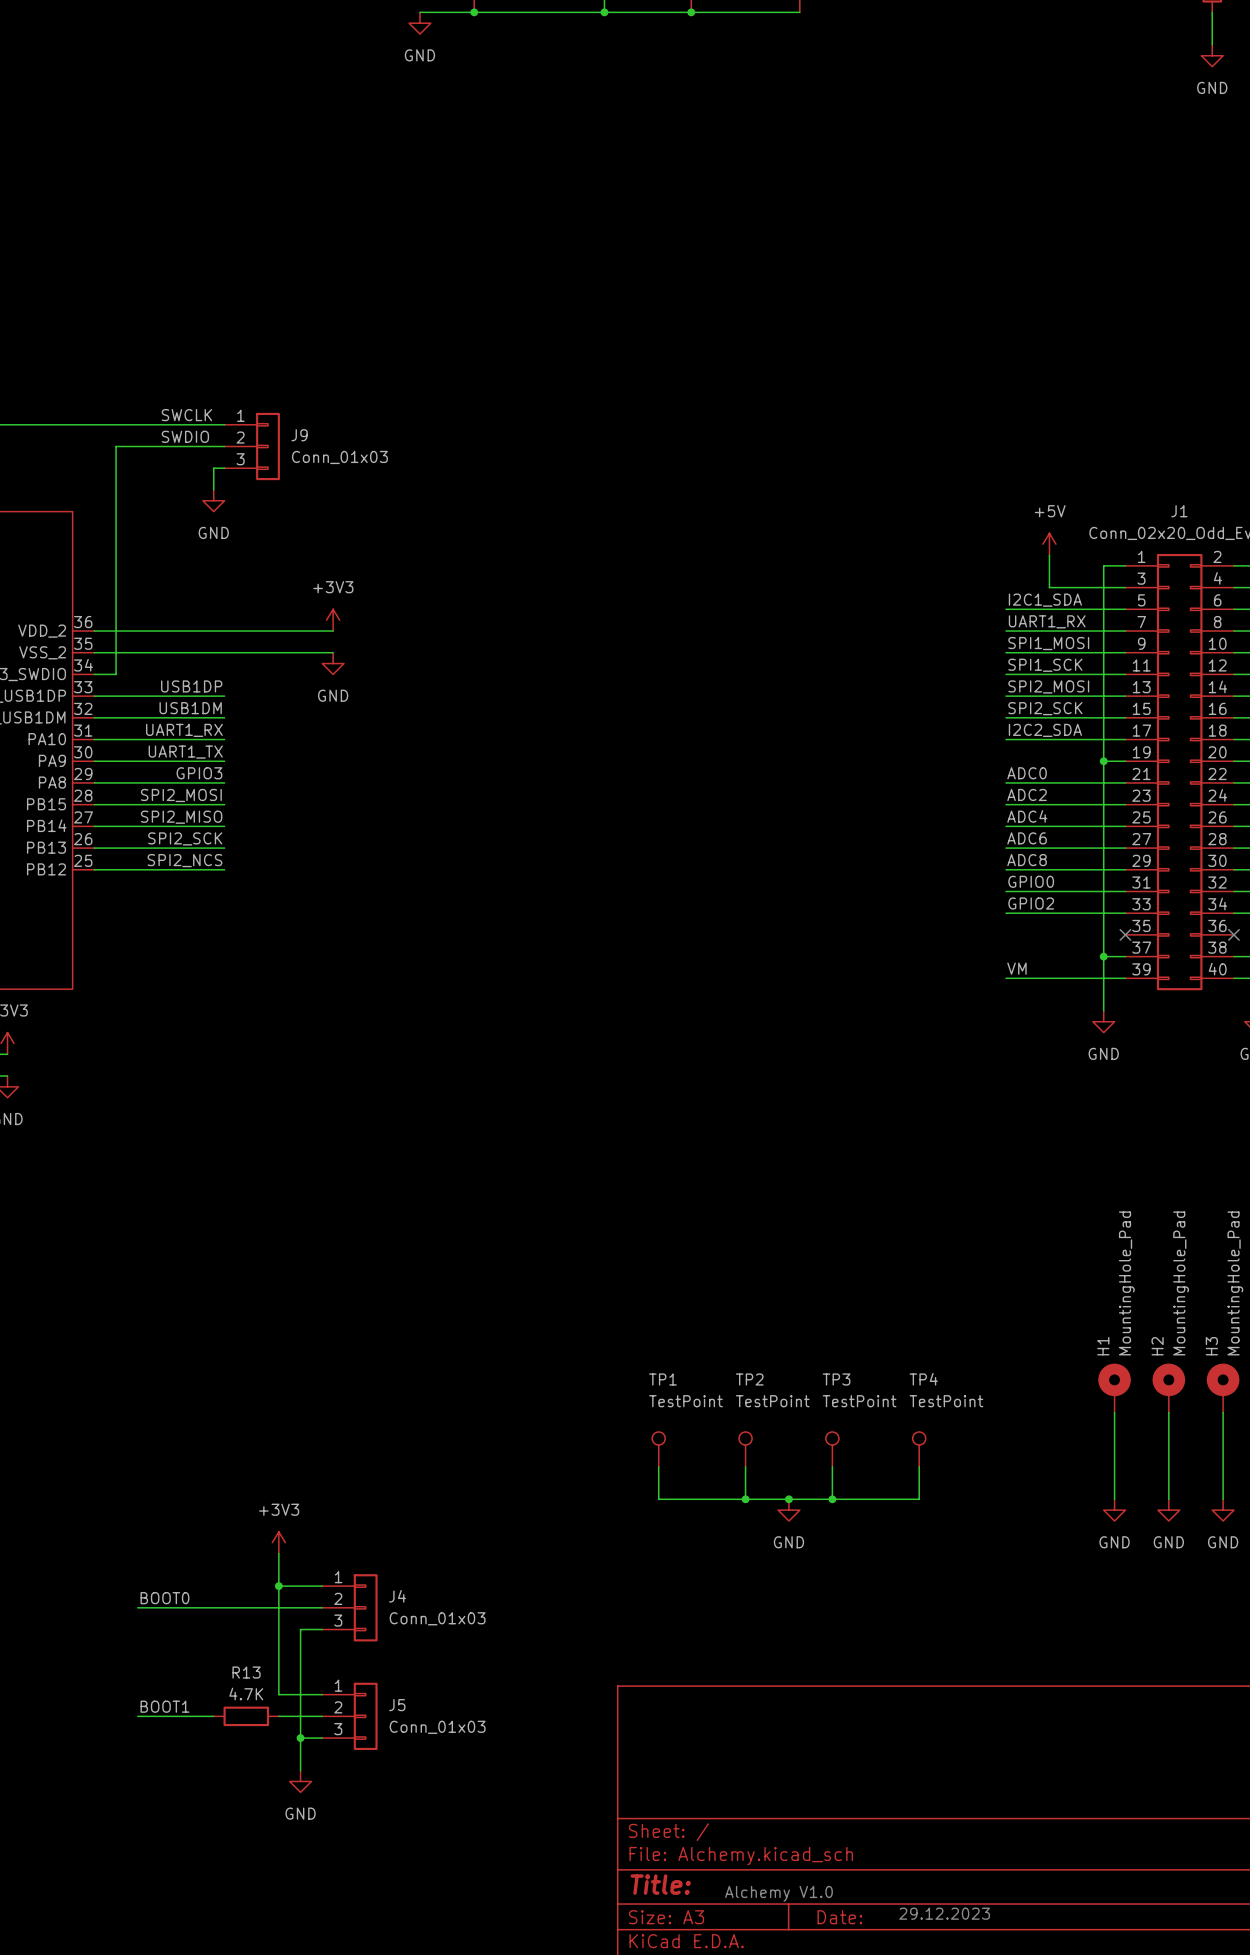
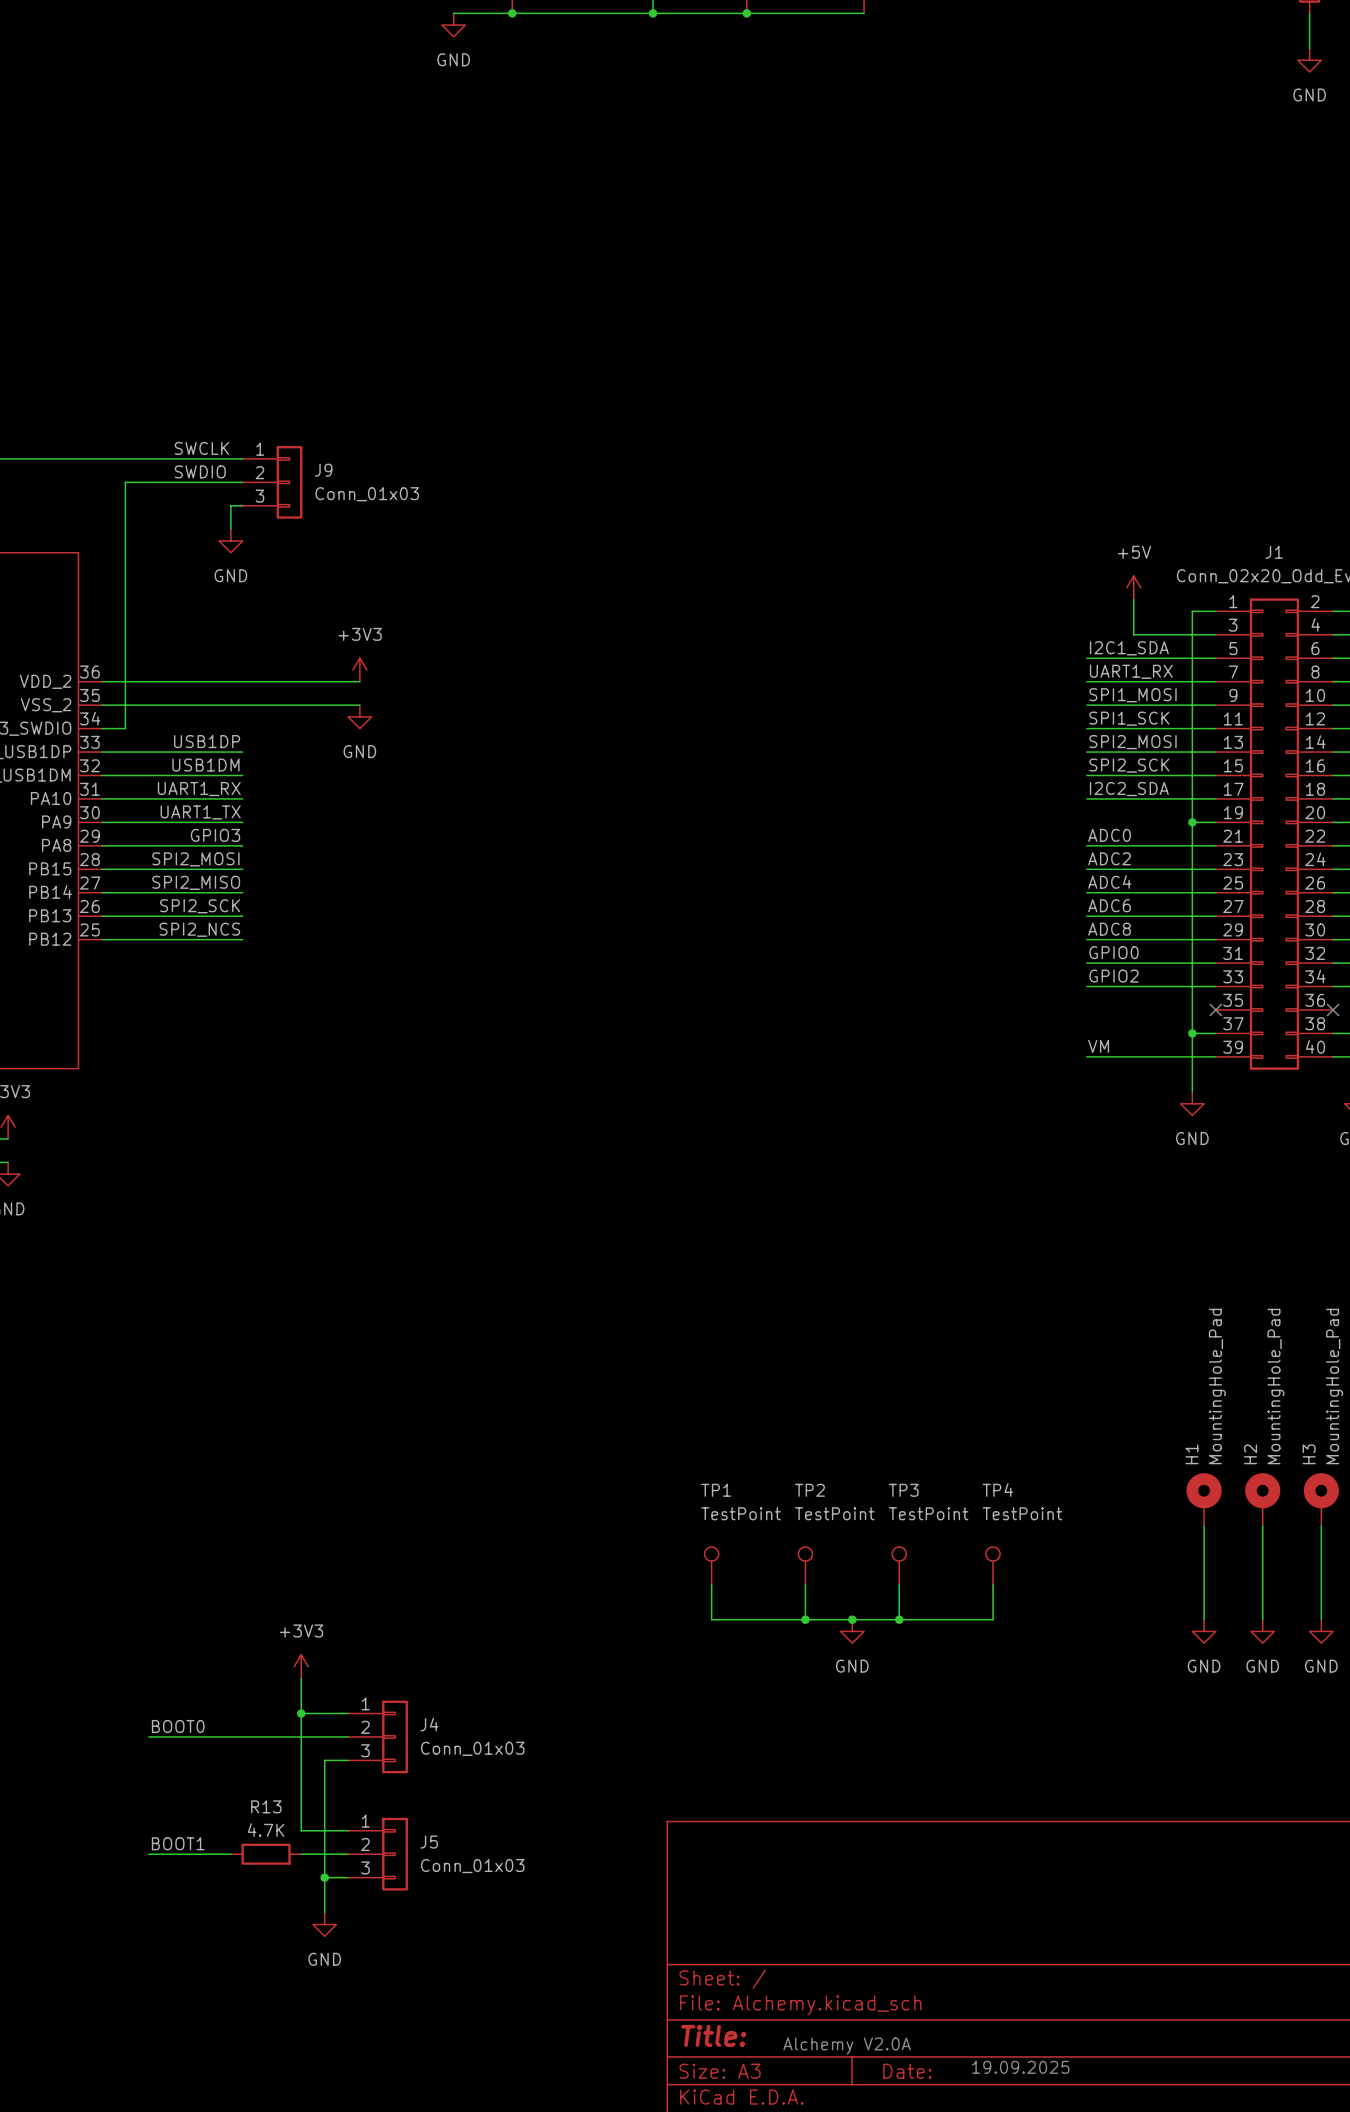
text: Alchemy V1.0 (778, 1893) -> Alchemy V2.0A (847, 2045)
text: 29.12.2023 (944, 1913) -> 19.09.2025 (1020, 2067)

